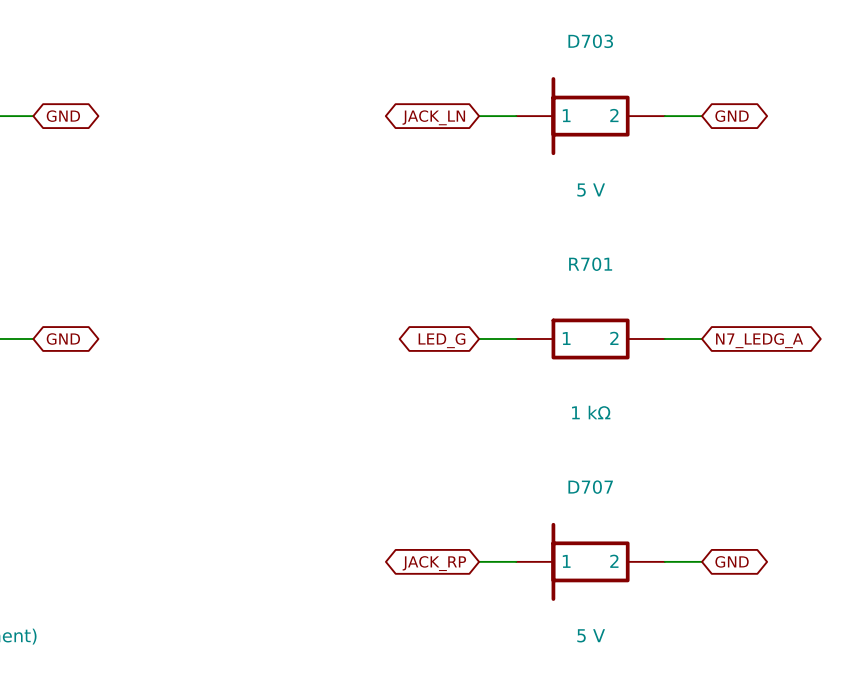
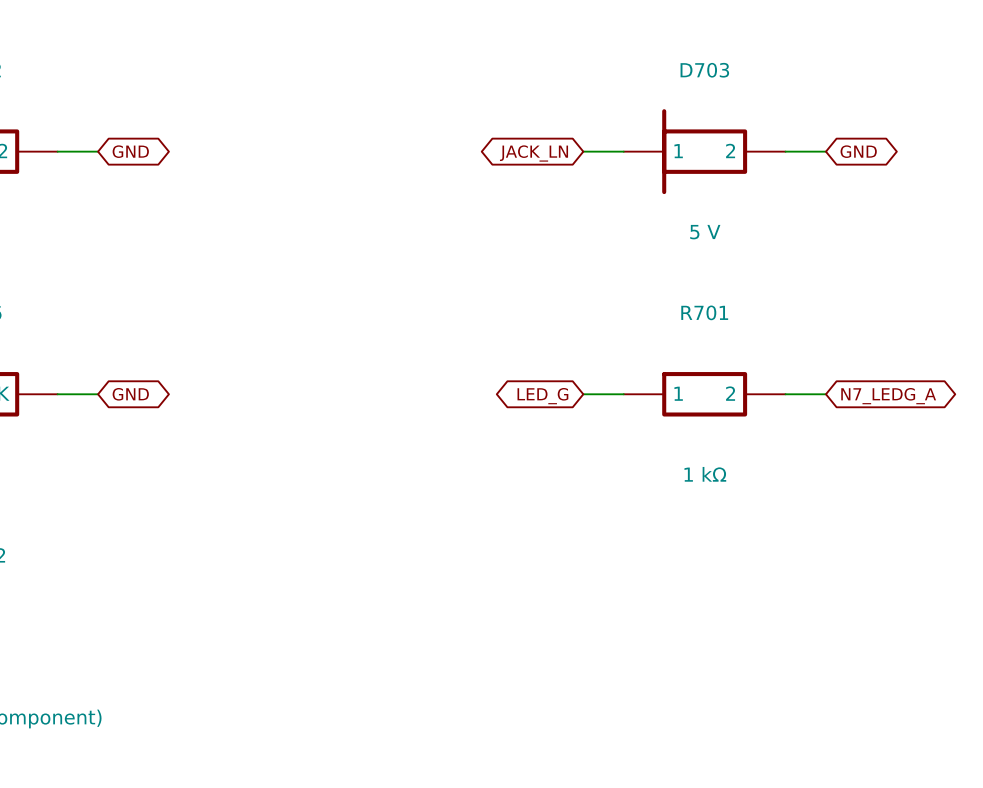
wire: (479, 561) (516, 561) -> none
D707: 5 V (590, 561) -> none
wire: (664, 561) (702, 561) -> none
global label: GND (732, 561) -> none
global label: JACK_RP (434, 563) -> none

